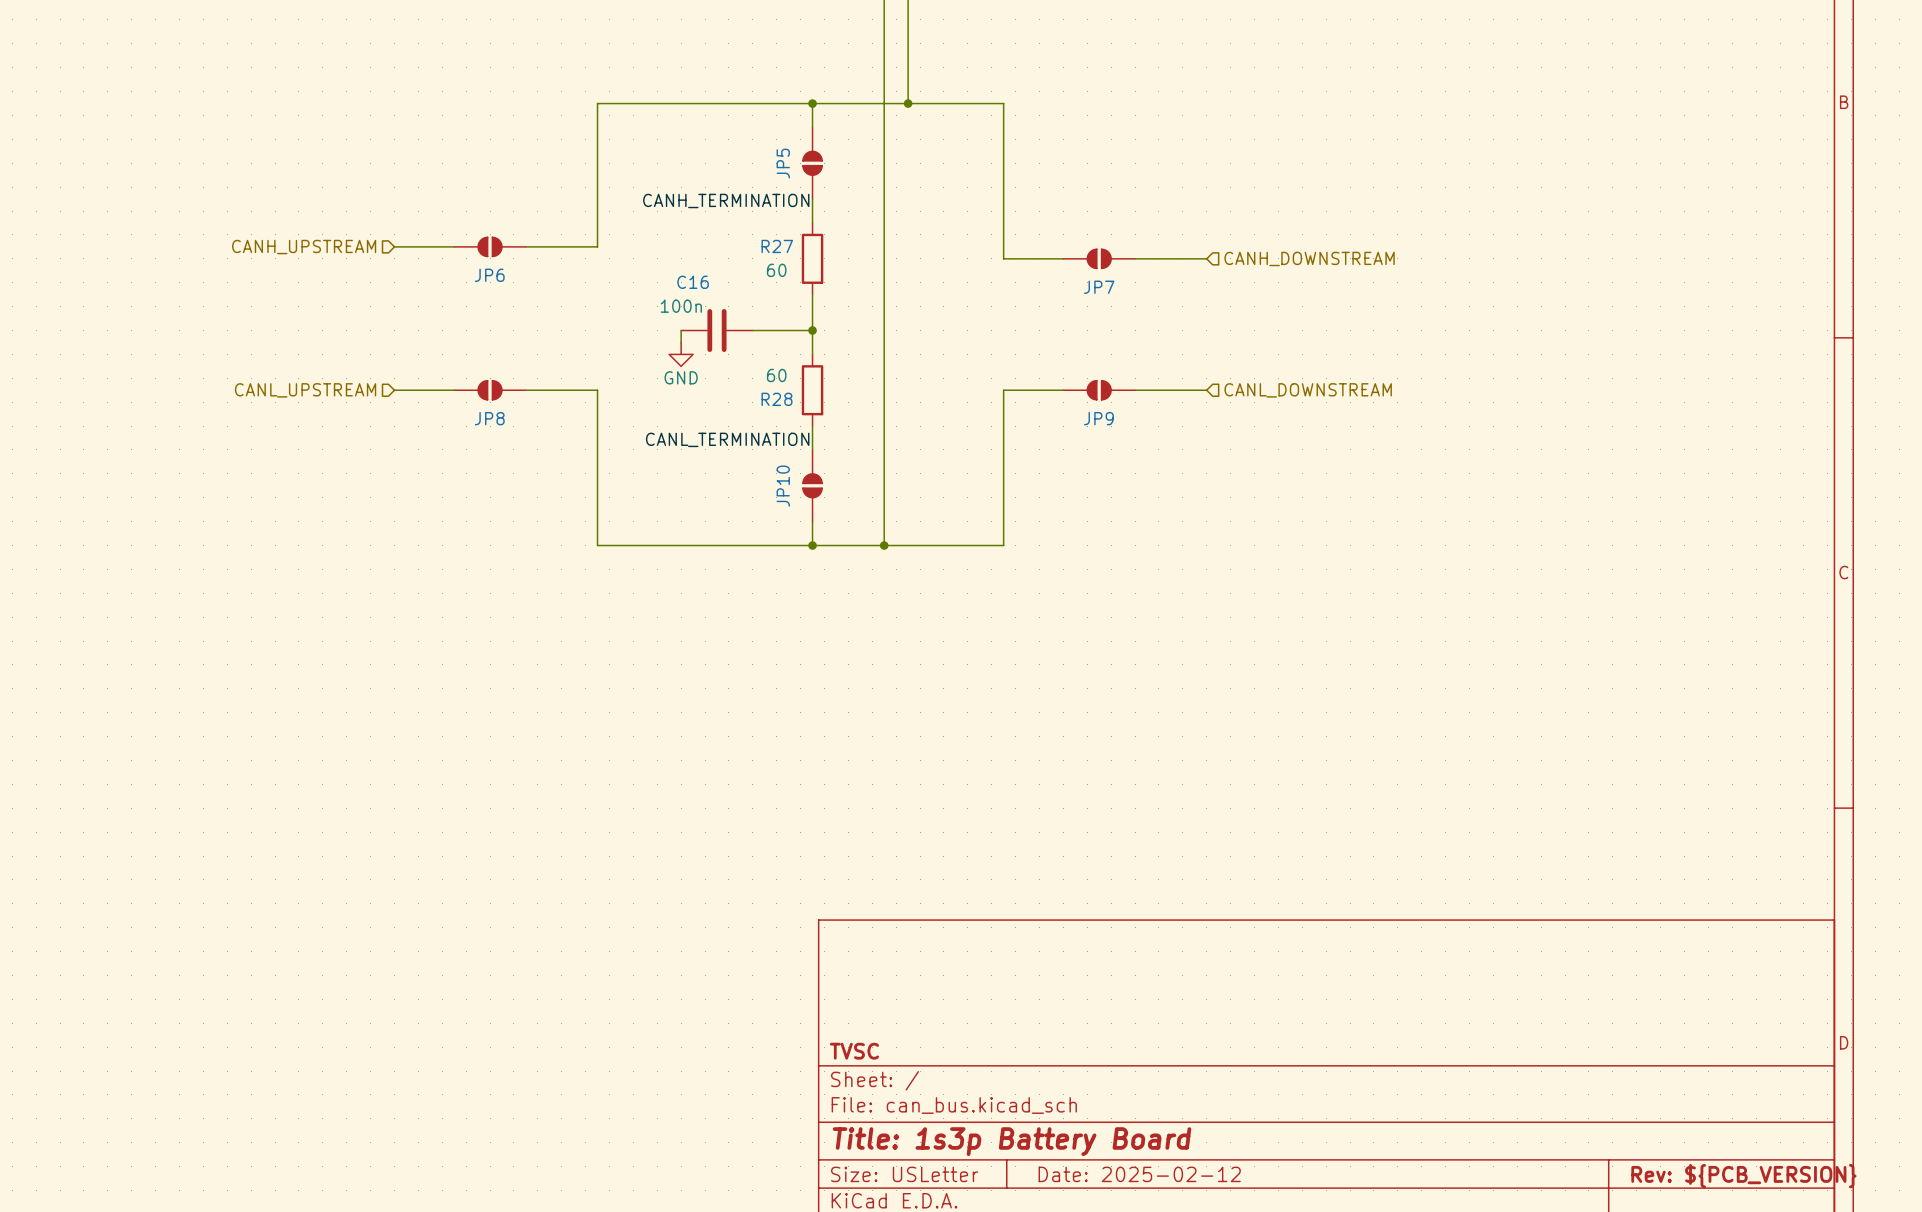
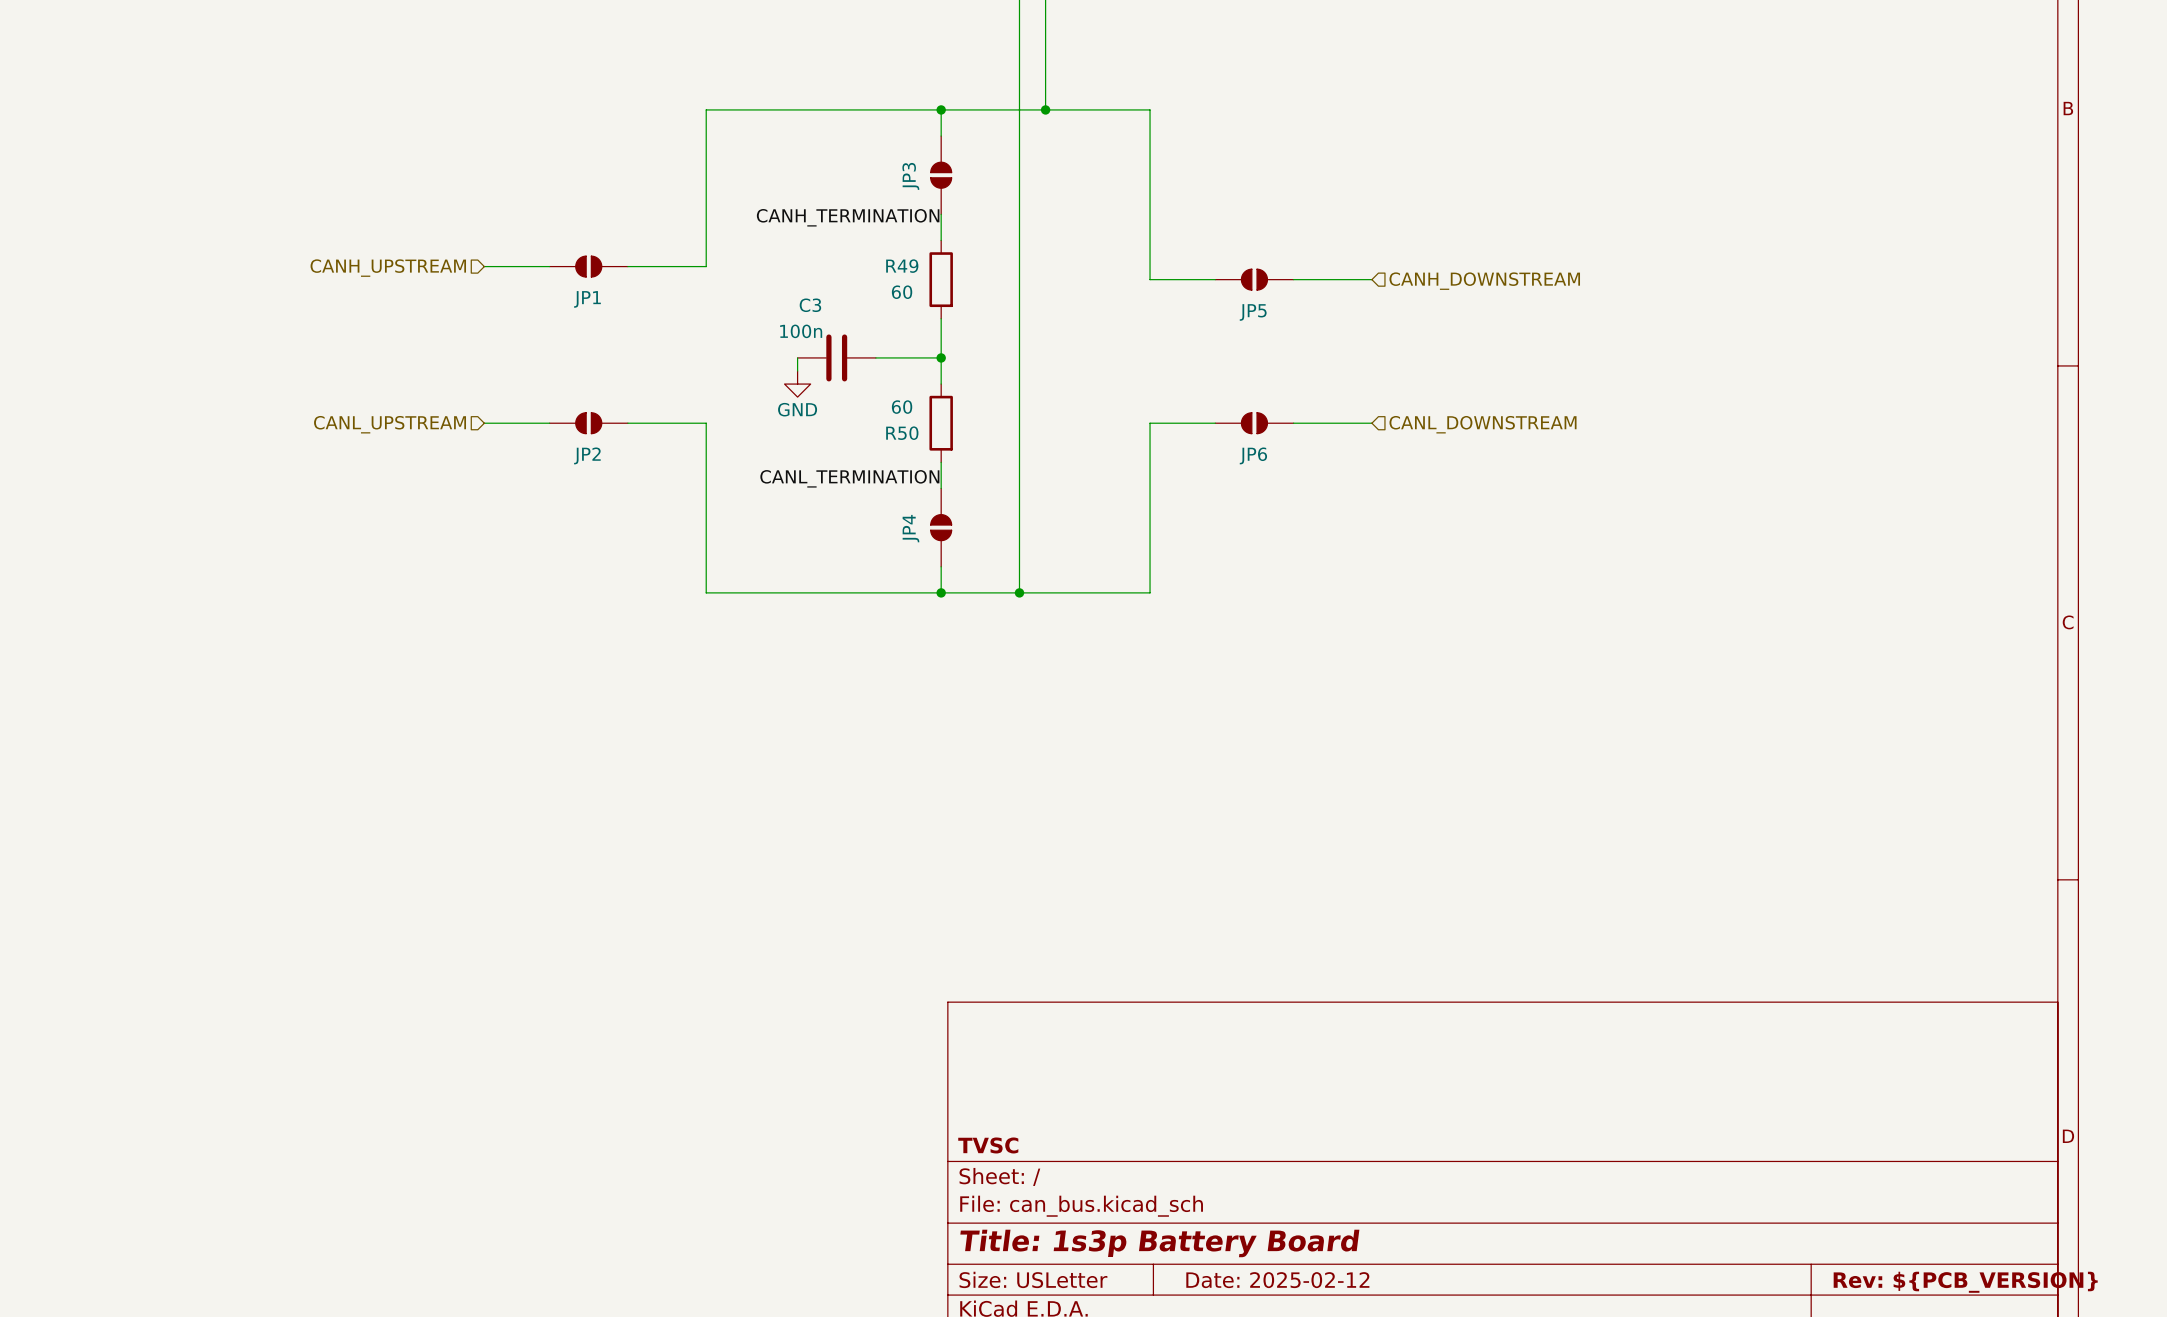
JP5 name: JP5 (783, 163) -> JP3 (910, 176)
R27 name: R27 (777, 246) -> R49 (902, 266)
JP6 name: JP6 (489, 275) -> JP1 (587, 299)
C16 name: C16 (693, 282) -> C3 (810, 305)
JP7 name: JP7 (1099, 287) -> JP5 (1253, 312)
R28 name: R28 (776, 399) -> R50 (902, 433)
JP8 name: JP8 (489, 418) -> JP2 (587, 455)
JP9 name: JP9 (1098, 418) -> JP6 (1253, 455)
JP10 name: JP10 (783, 486) -> JP4 (910, 528)

